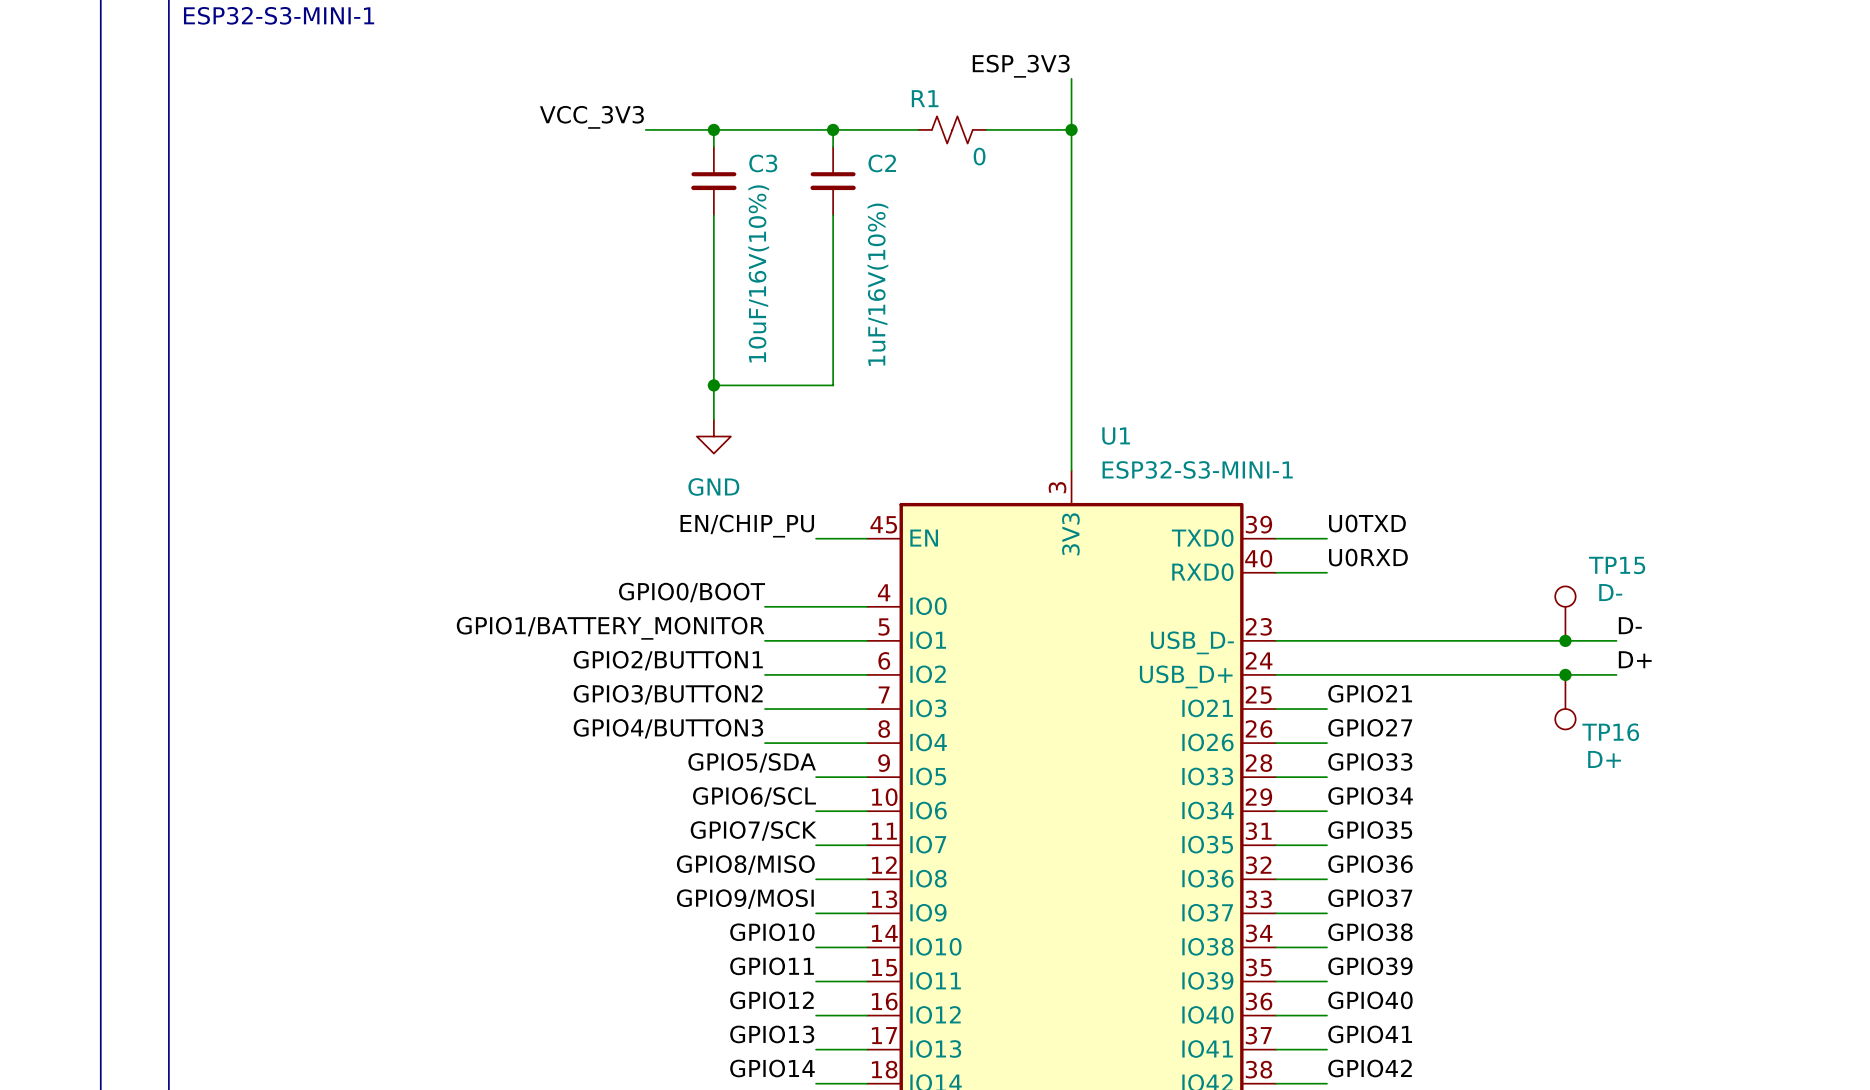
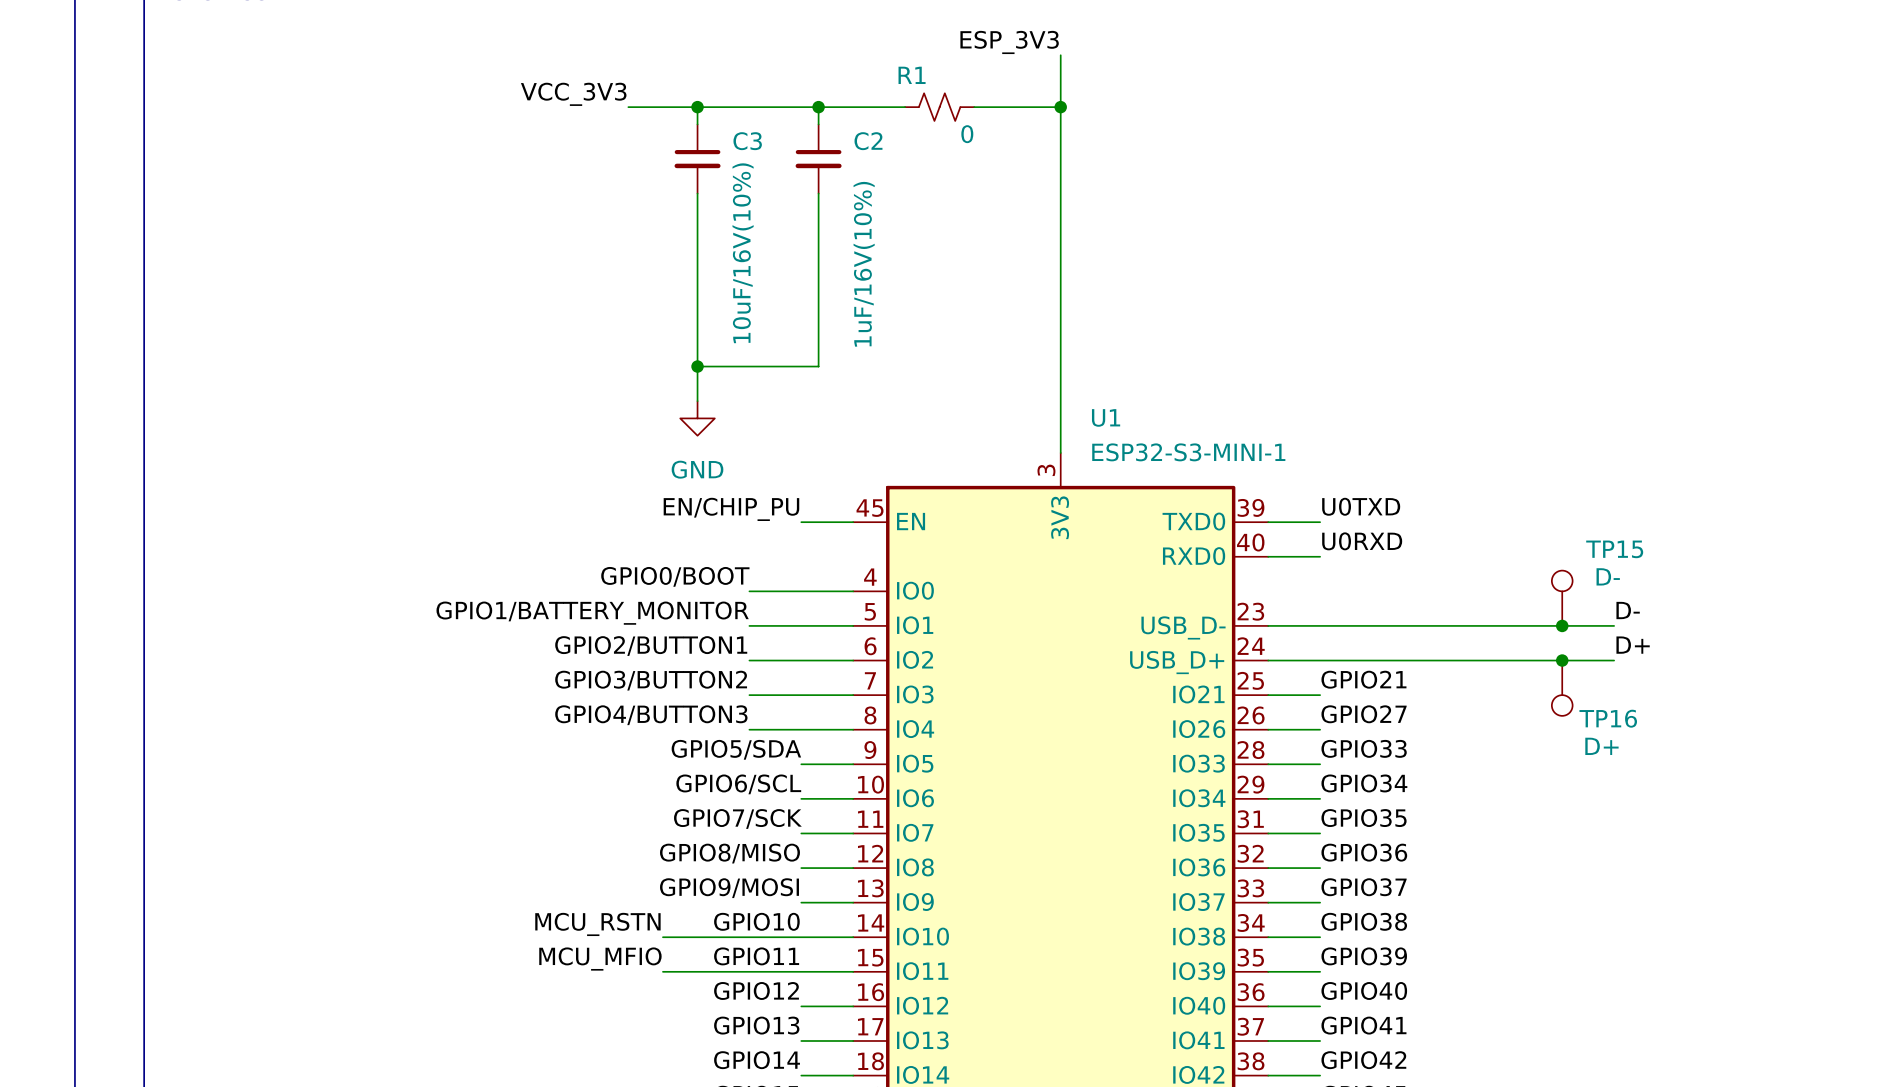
label: none -> MCU_RSTN (597, 924)
wire: none -> (662, 937) (801, 937)
label: none -> MCU_MFIO (600, 959)
wire: none -> (662, 971) (801, 971)

